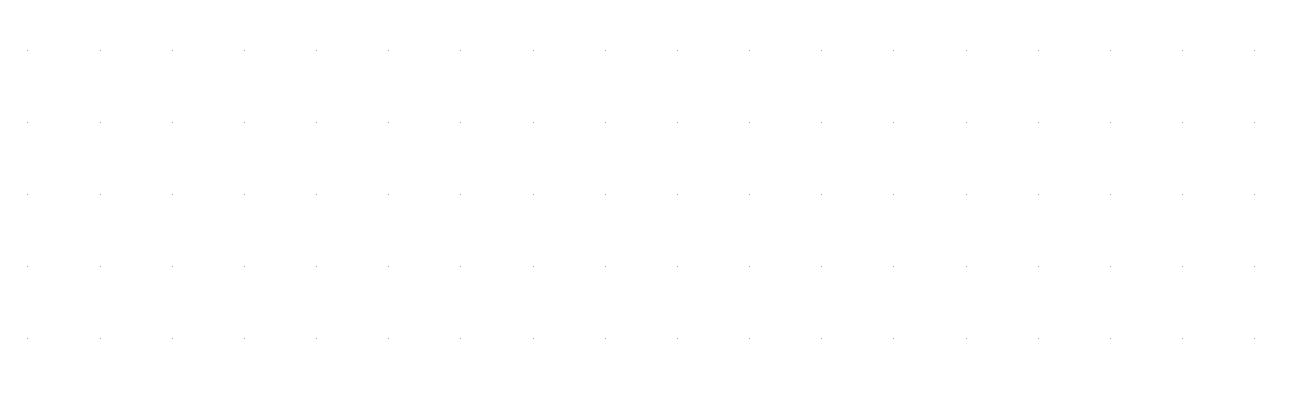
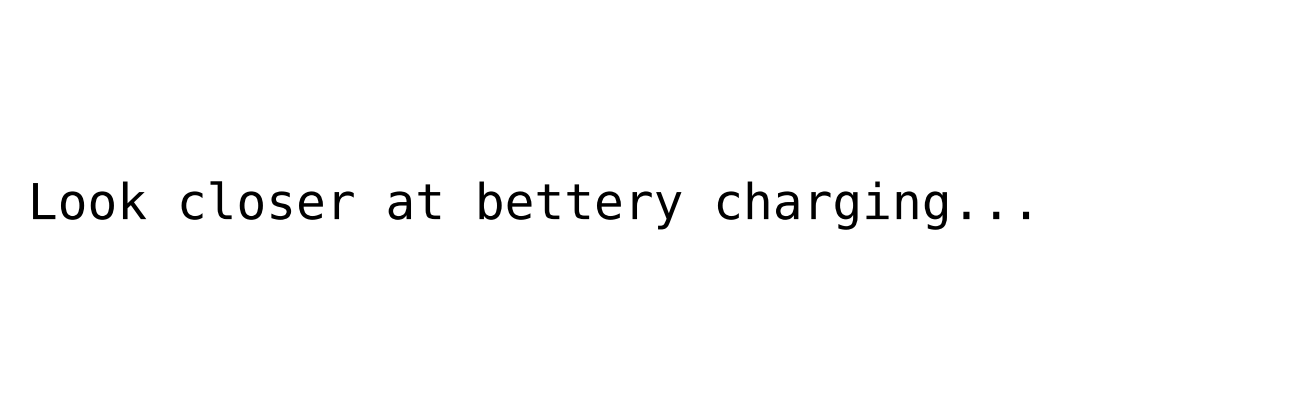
text: none -> Look closer at bettery charging... (531, 205)

